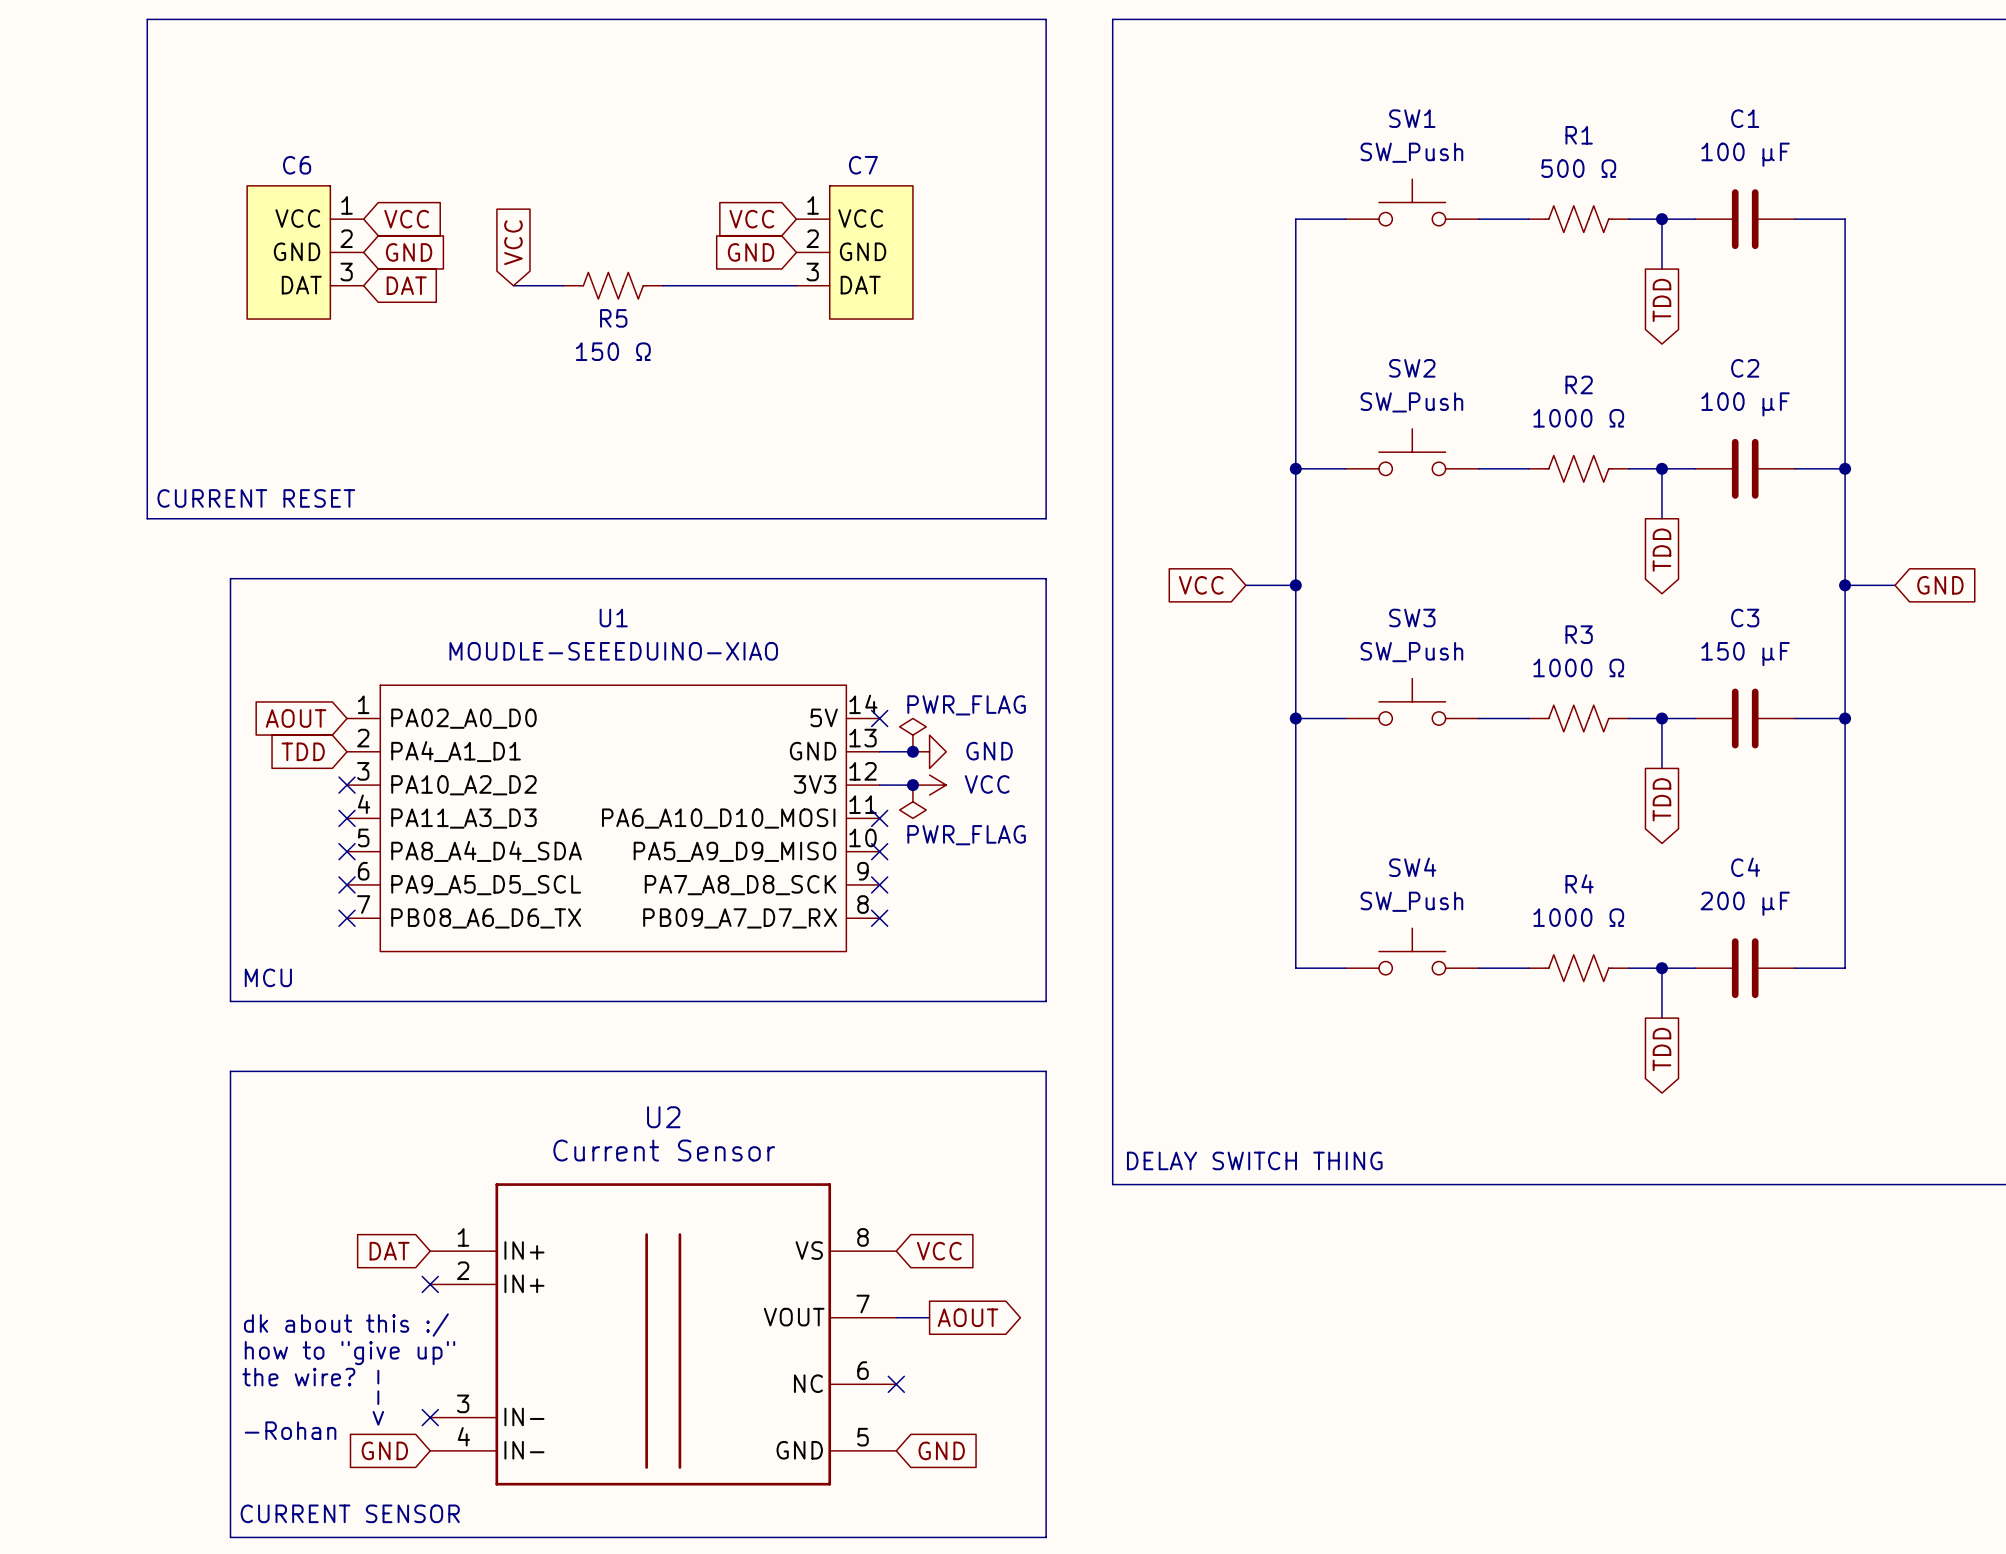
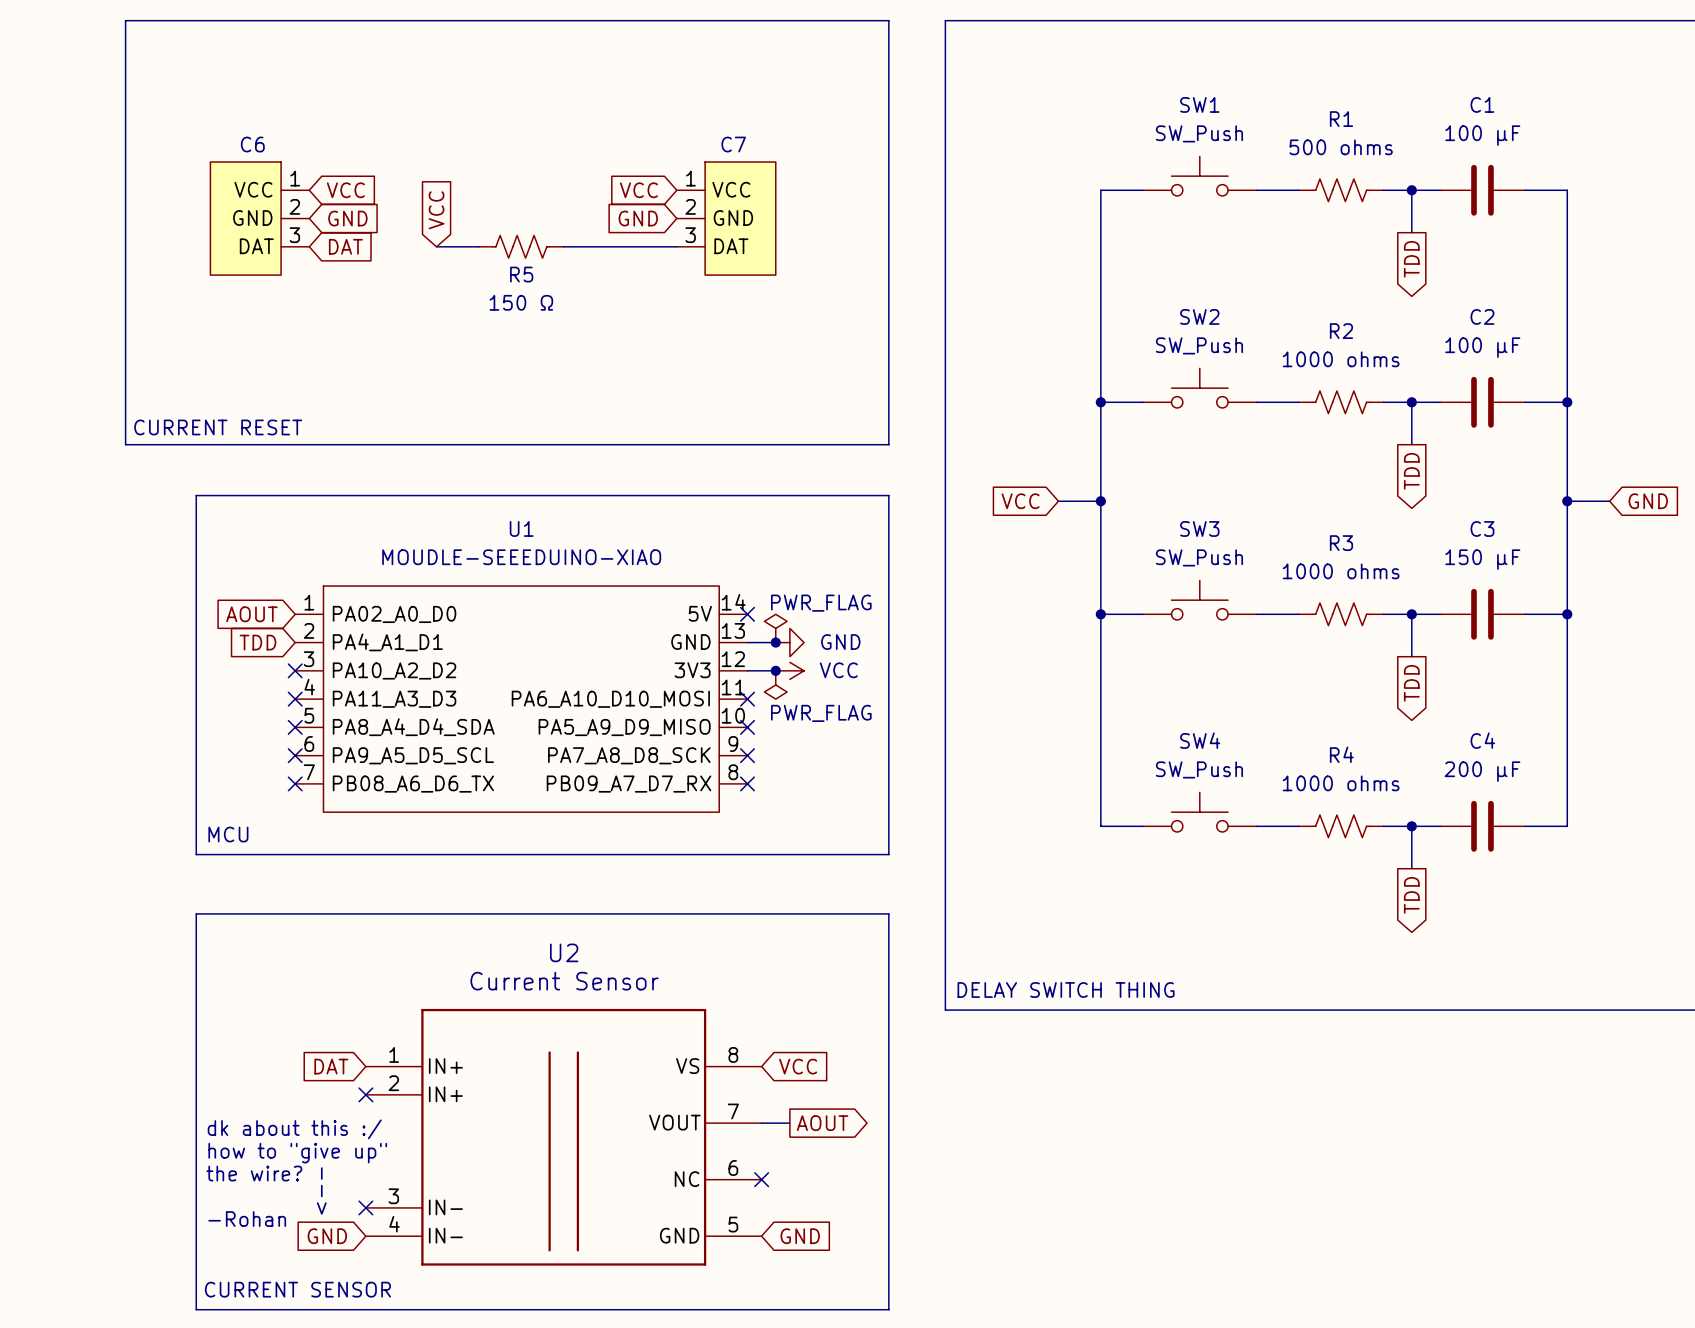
R1 value: 500 Ω (1578, 168) -> 500 ohms (1341, 147)
R2 value: 1000 Ω (1578, 418) -> 1000 ohms (1341, 359)
R3 value: 1000 Ω (1578, 667) -> 1000 ohms (1341, 571)
R4 value: 1000 Ω (1578, 917) -> 1000 ohms (1341, 783)

